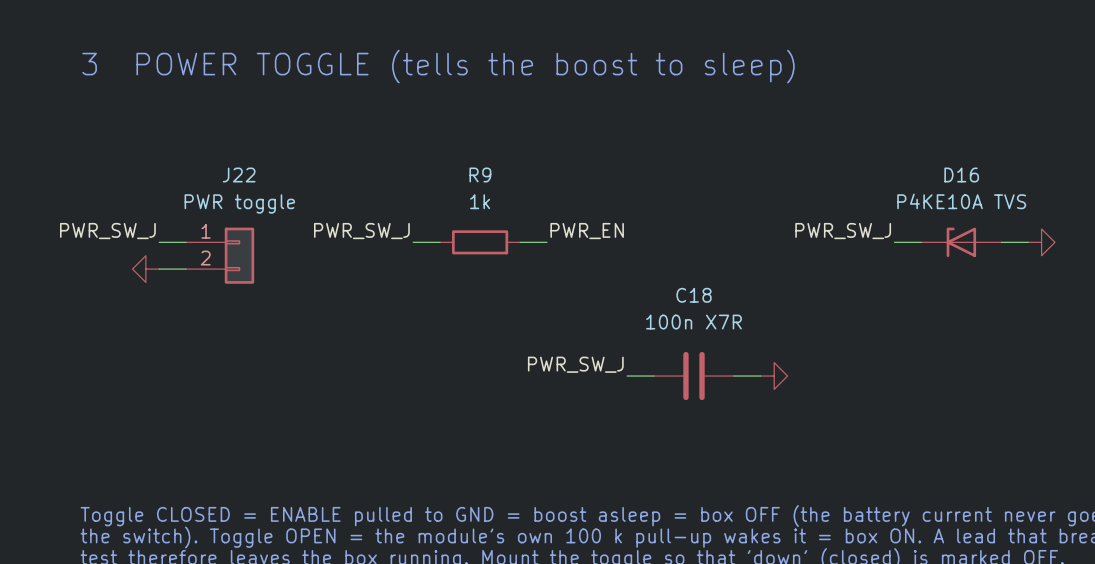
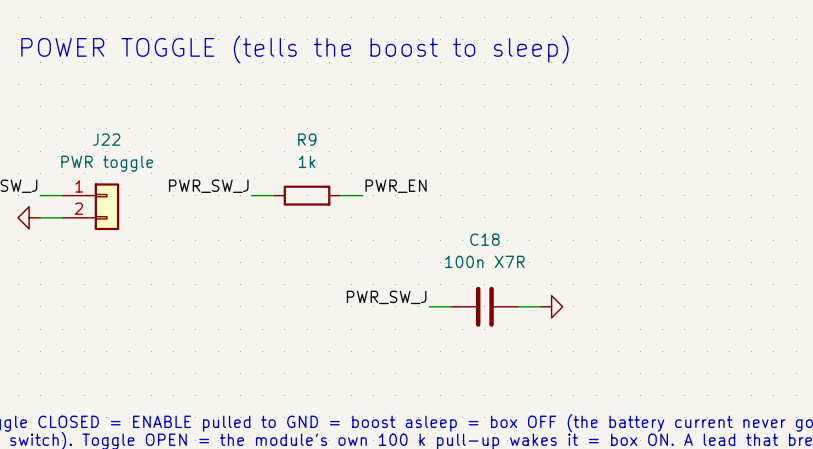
label: PWR_SW_J (843, 231) -> none
wire: (894, 242) (921, 242) -> none
D16: P4KE10A TVS (961, 242) -> none
wire: (1001, 242) (1028, 242) -> none
power symbol: (1041, 242) -> none

